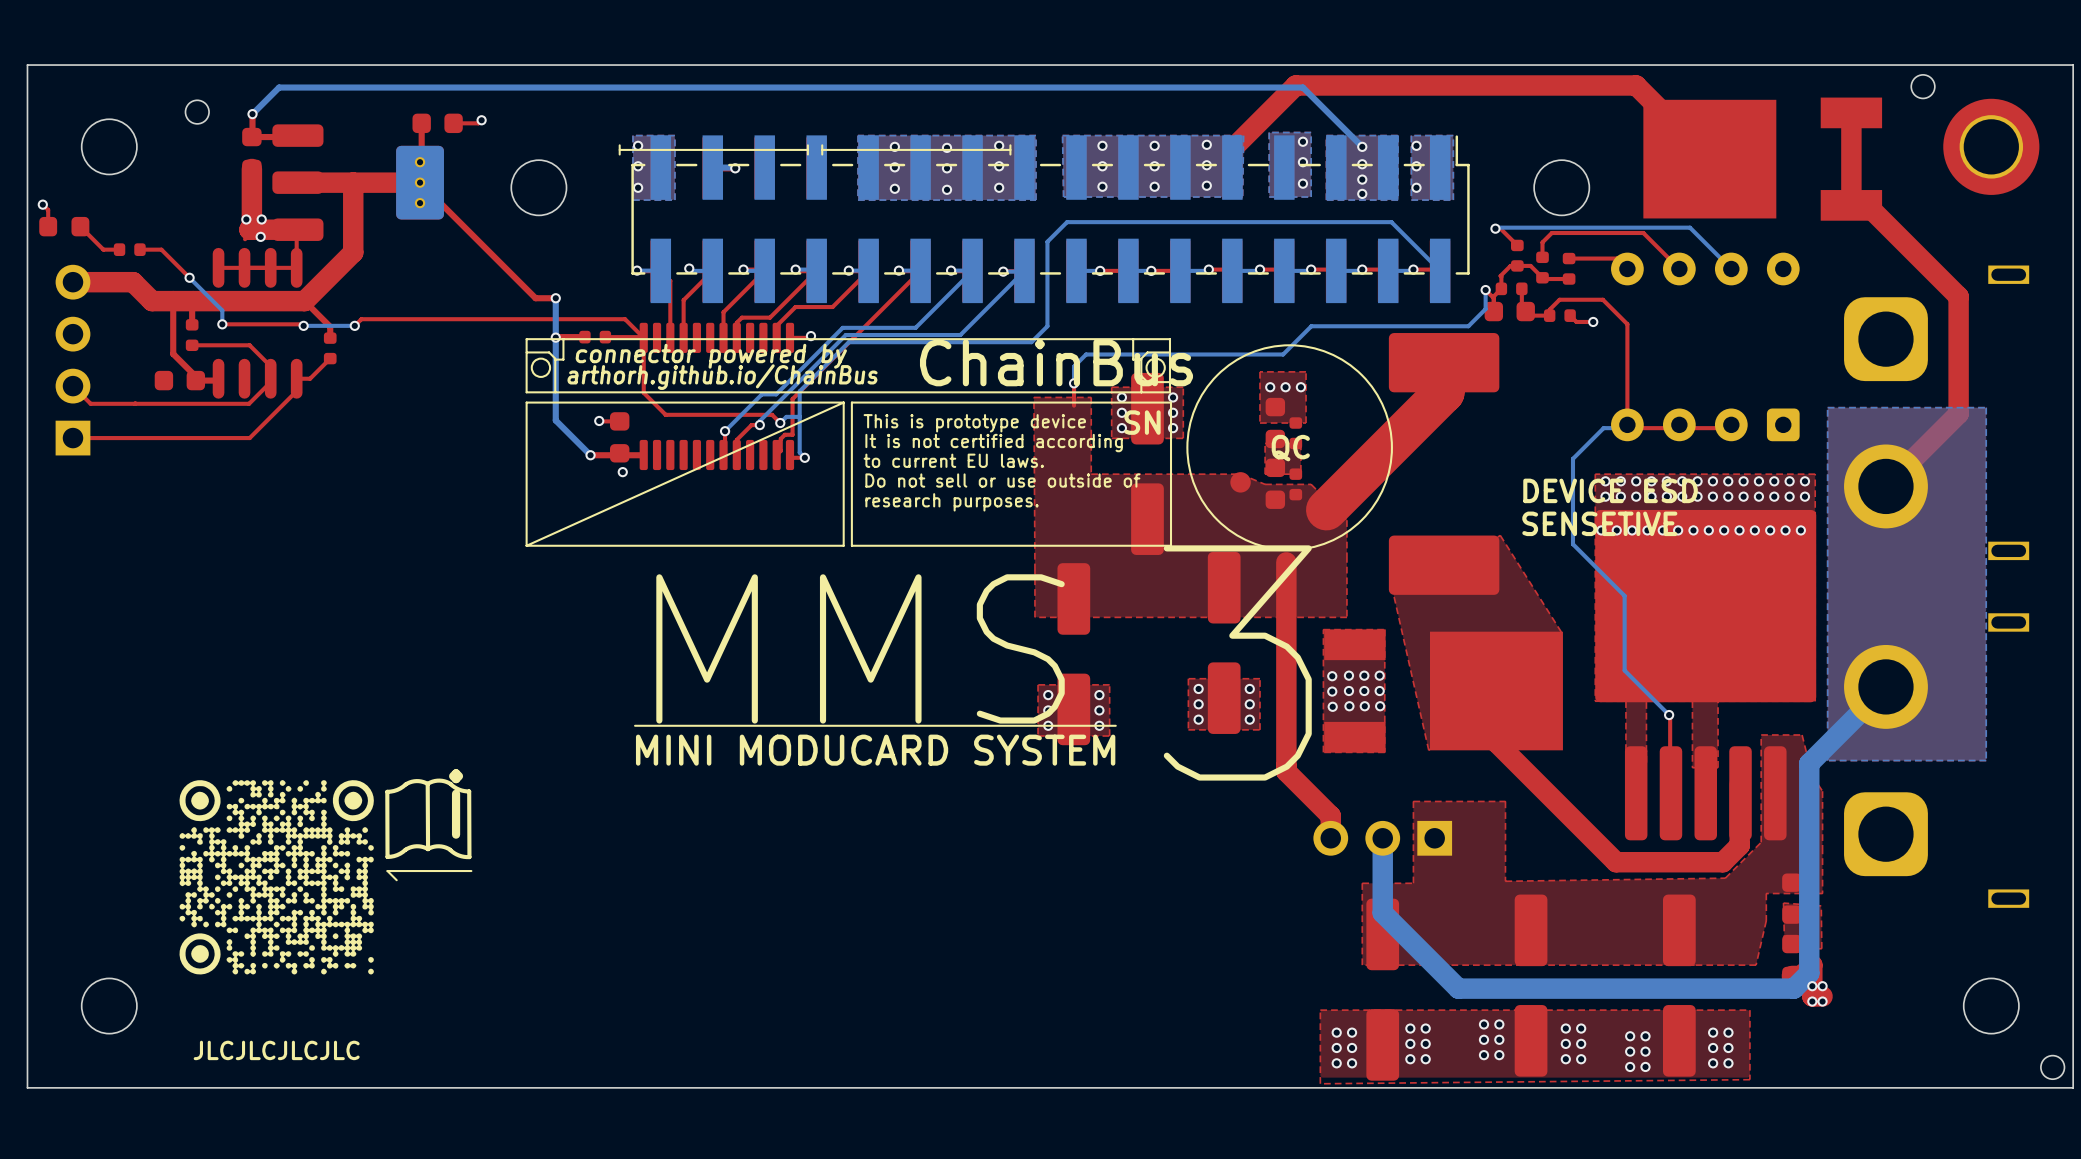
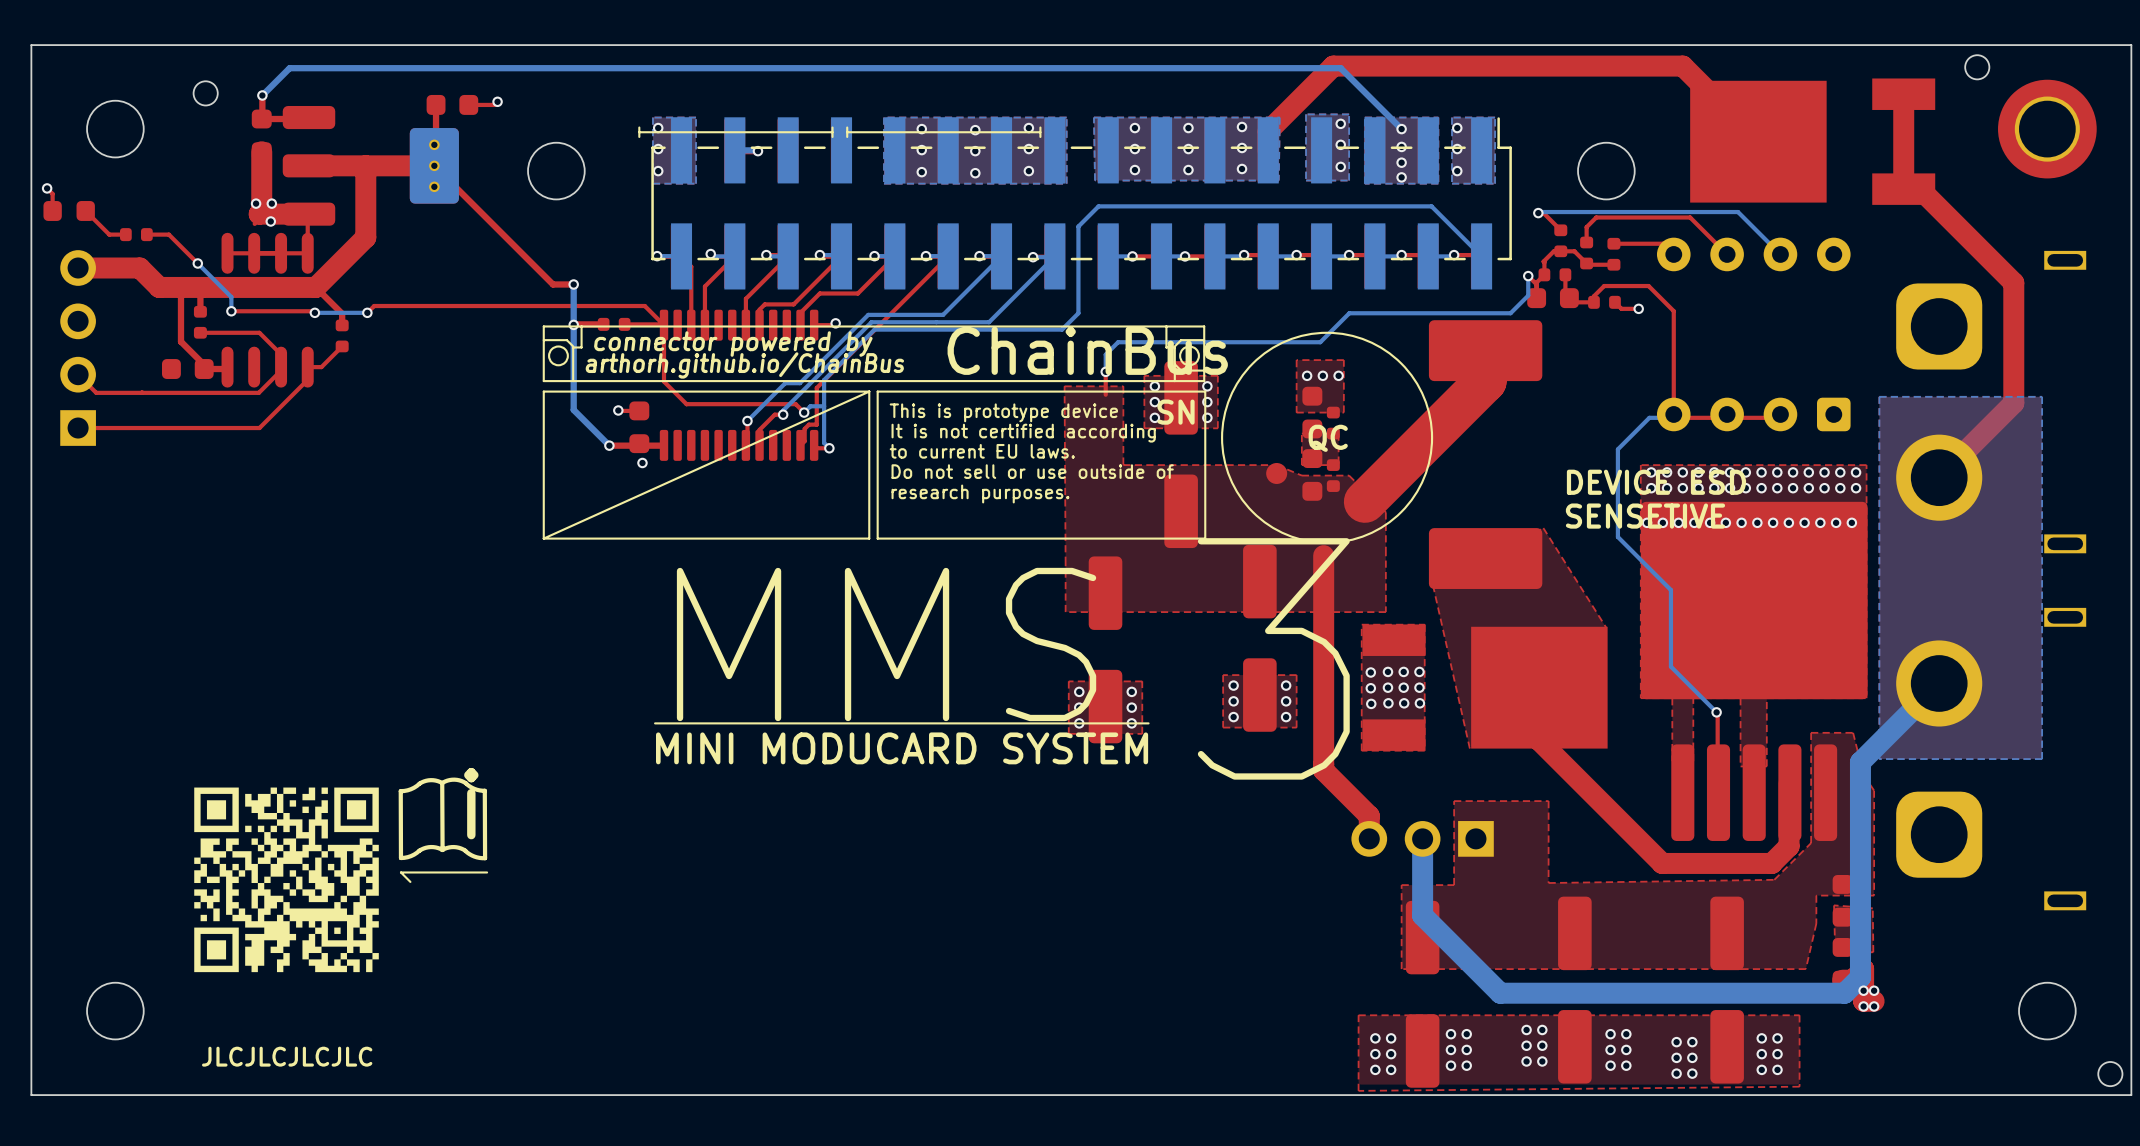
drawing shape: [179, 780, 374, 975] -> [194, 787, 379, 973]

